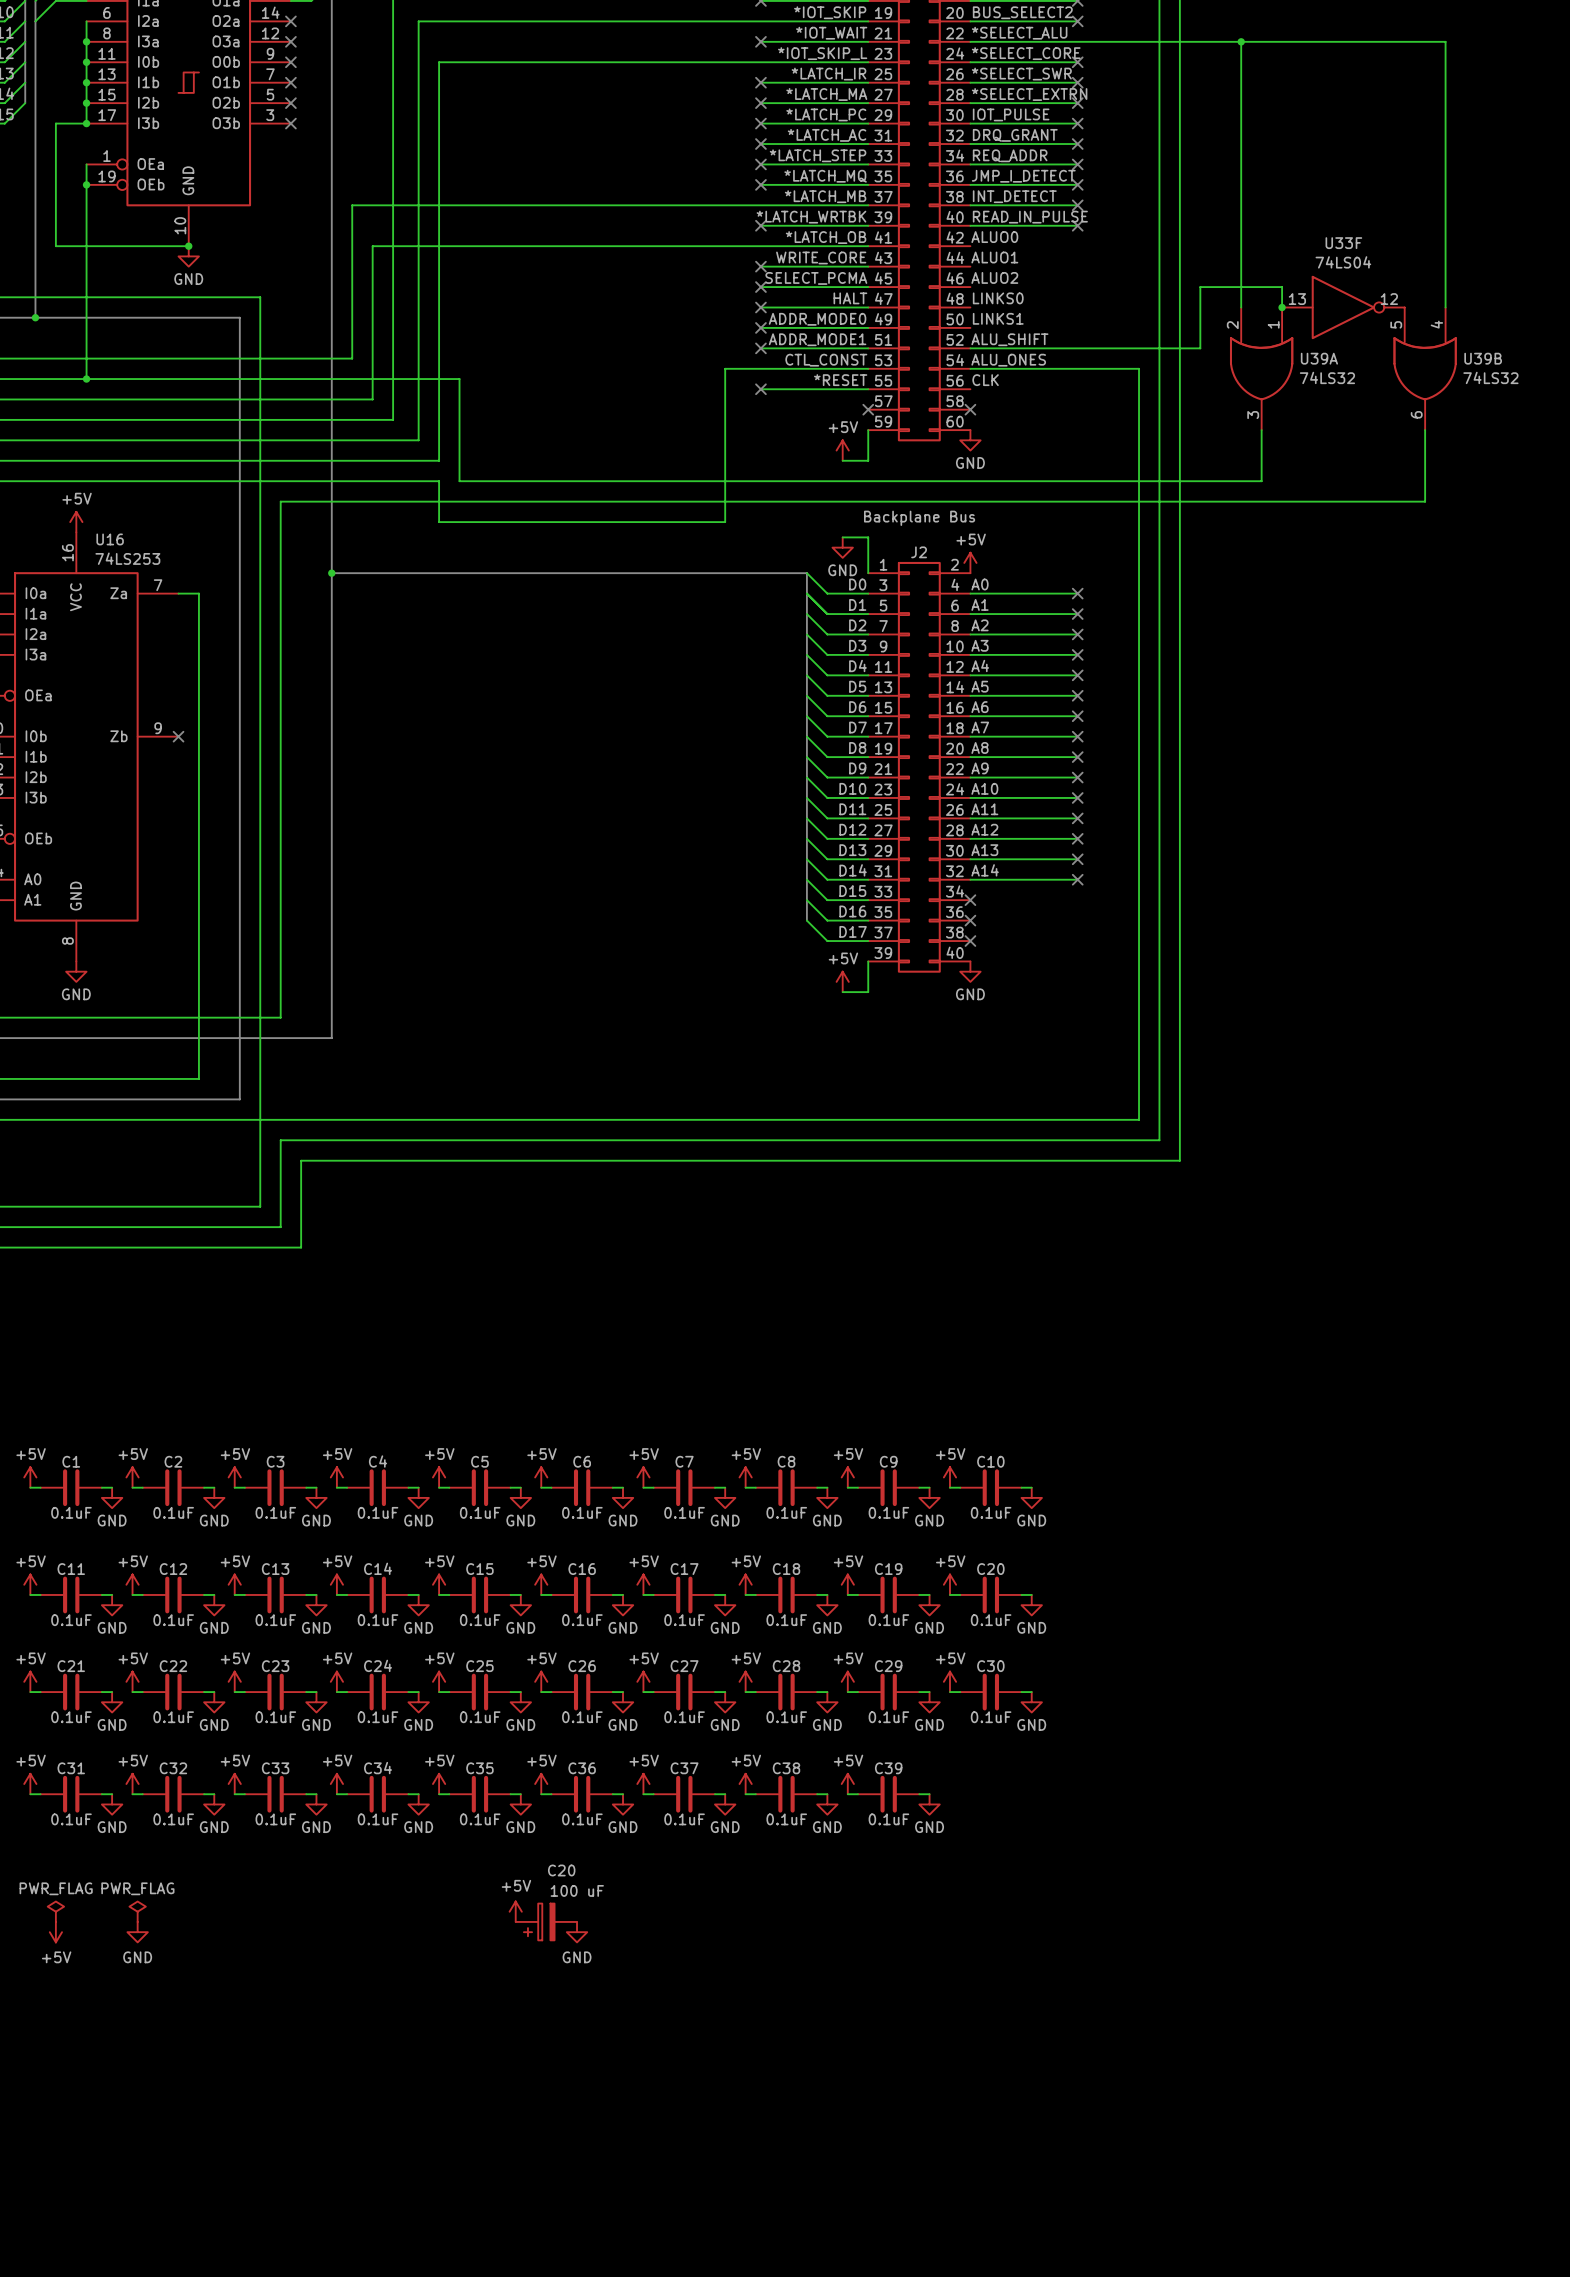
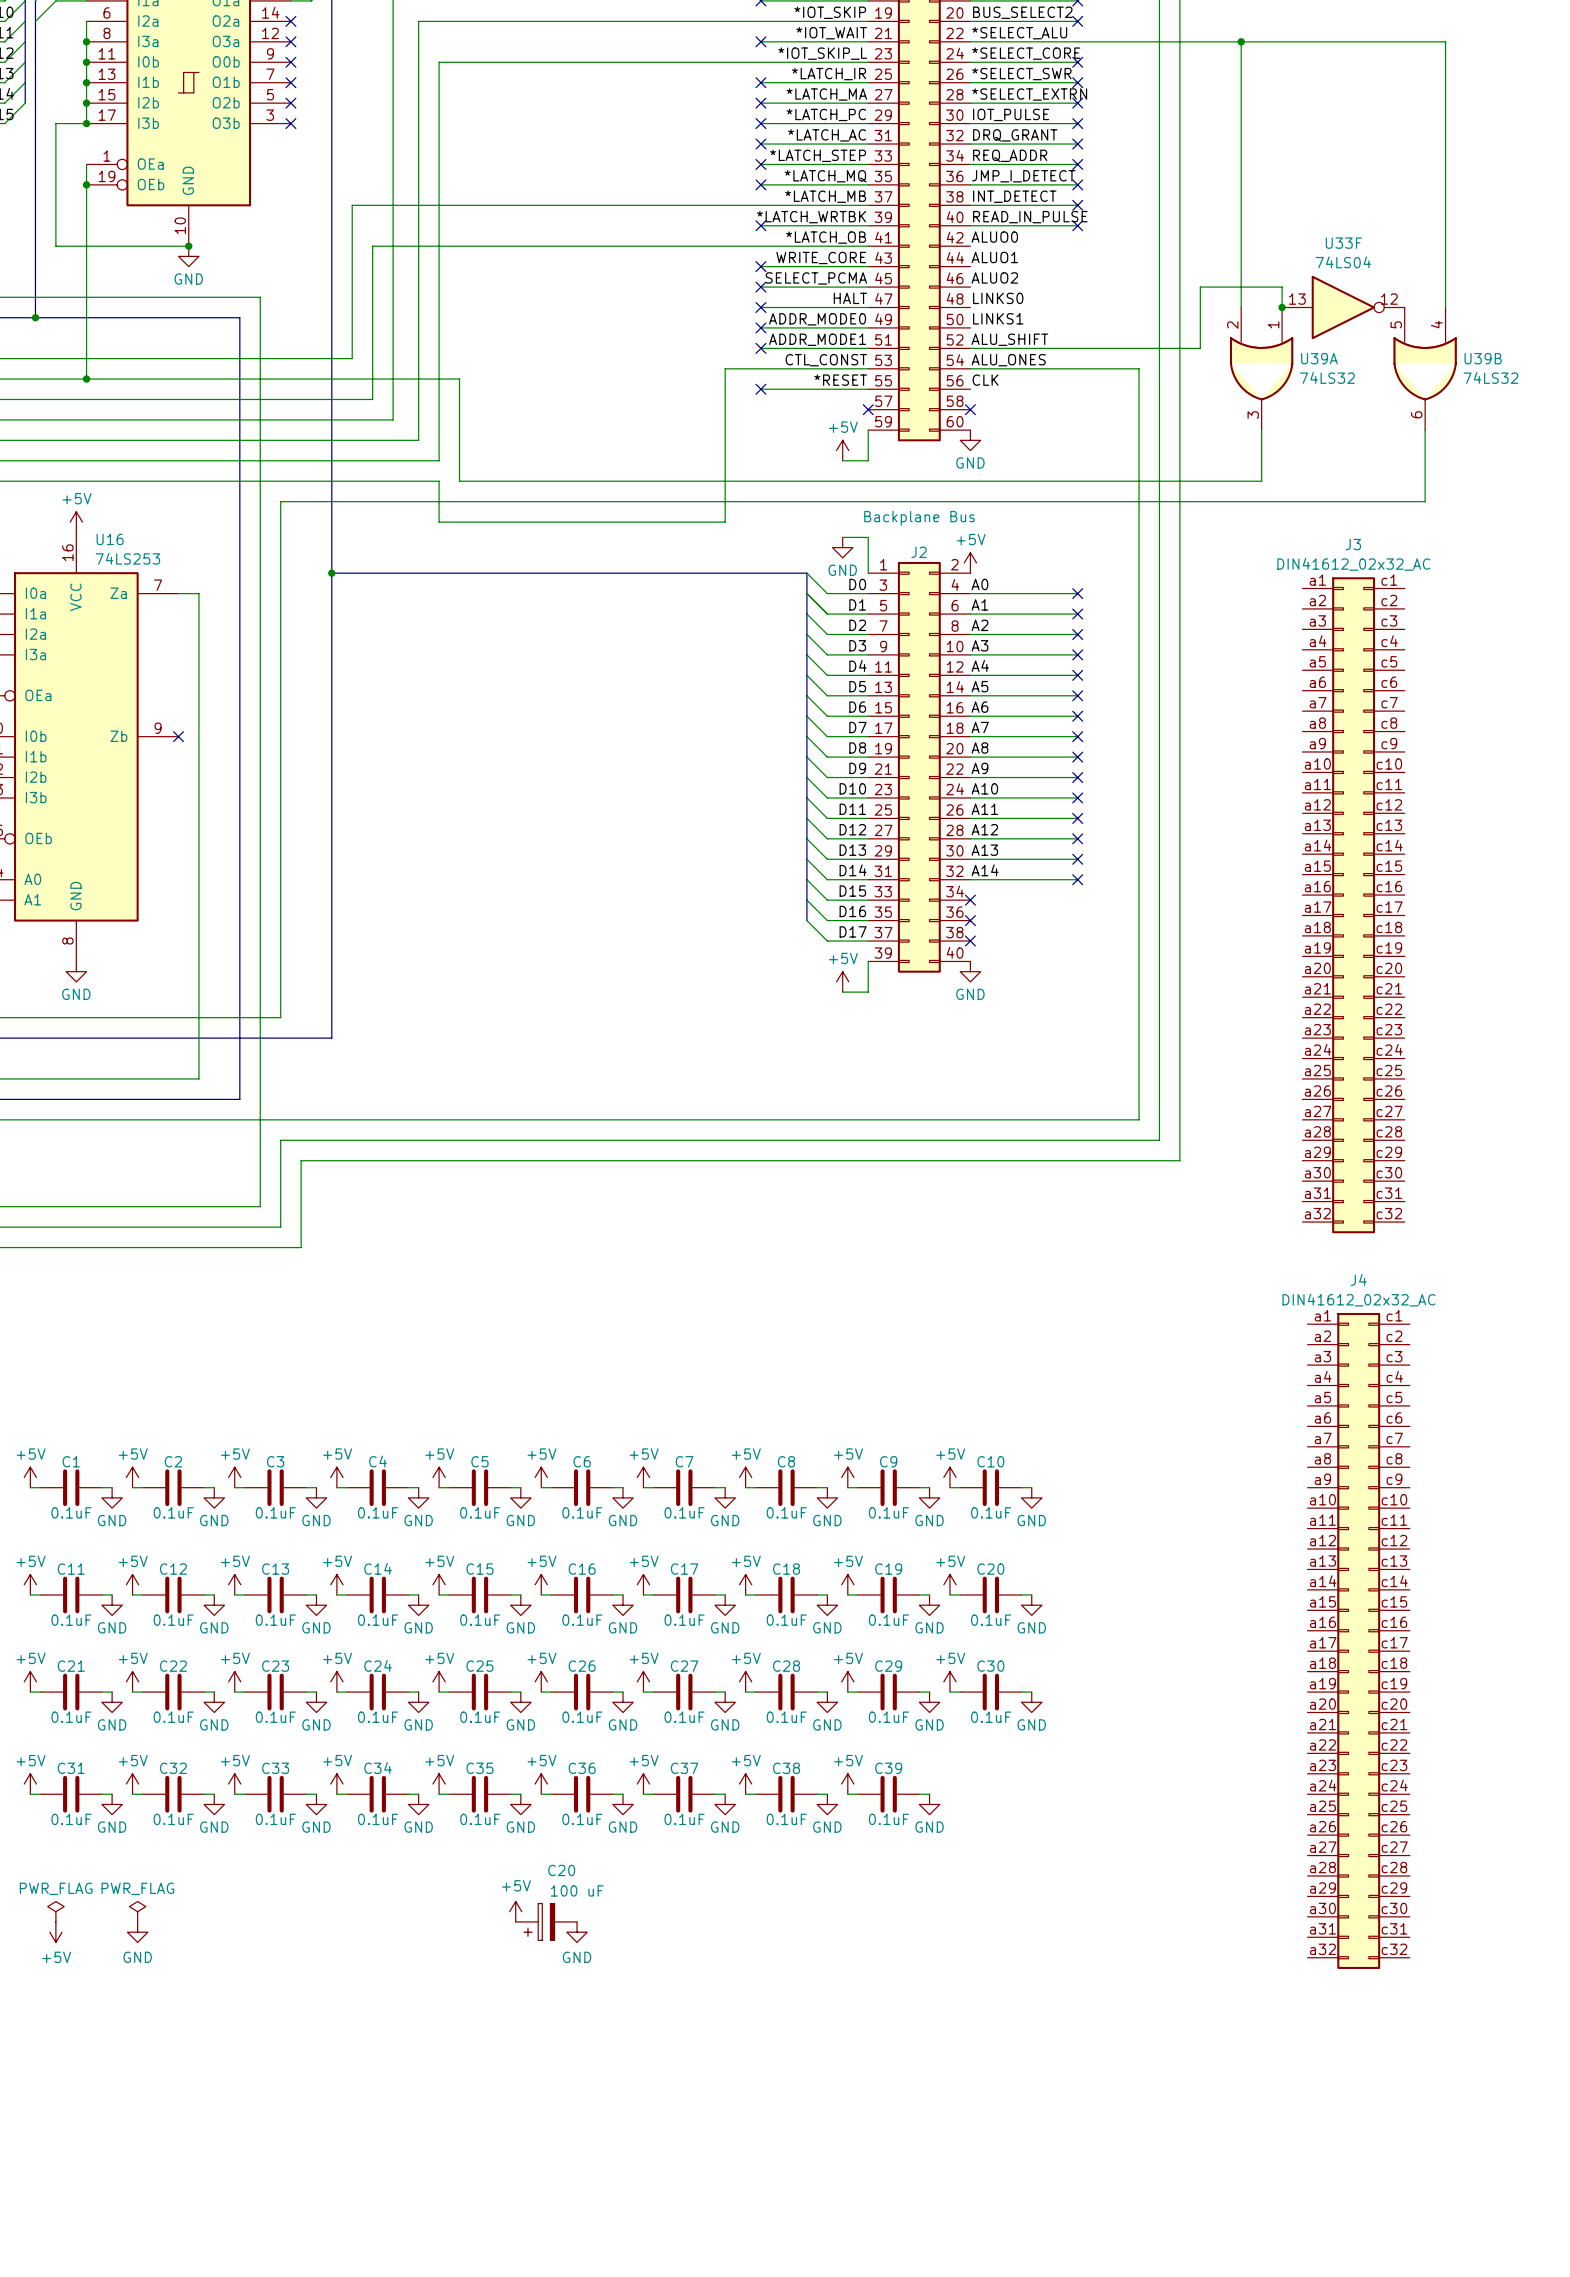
J3: none -> DIN41612_02x32_AC (1353, 905)
J4: none -> DIN41612_02x32_AC (1358, 1640)

